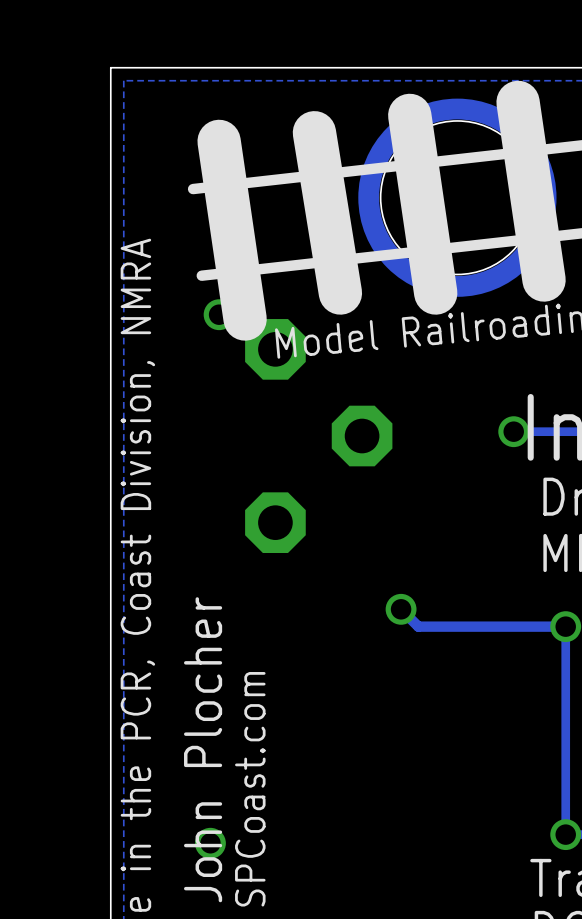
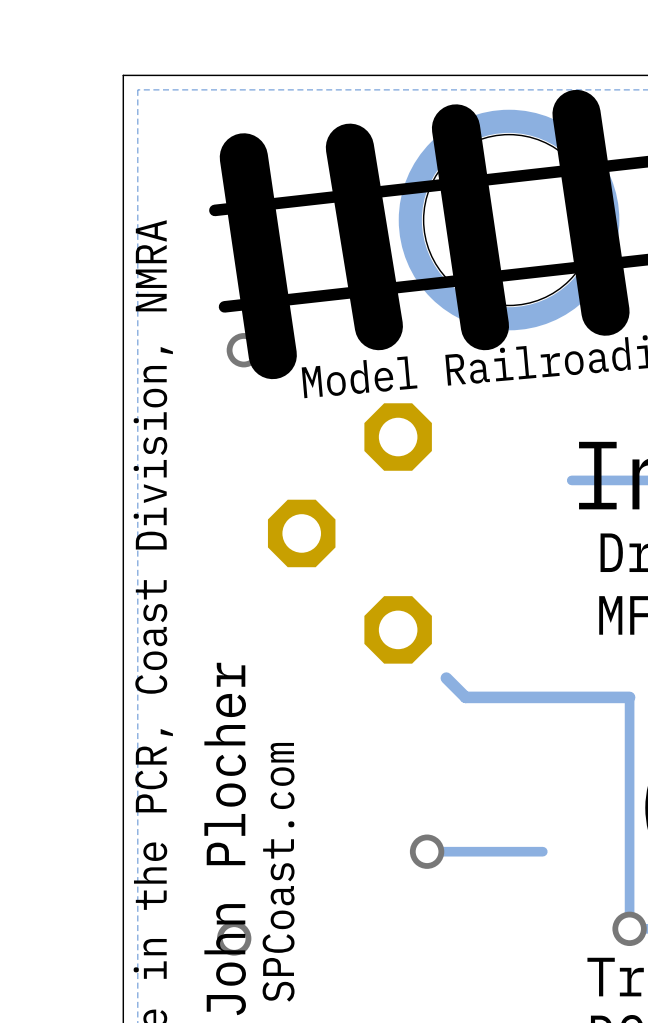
via: (513, 431) -> none
part rotation: 0° (318, 436) -> 180° (349, 533)
via: (401, 609) -> none
via: (565, 626) -> none
via: none -> (427, 851)
track: none -> (542, 851) (427, 851)

